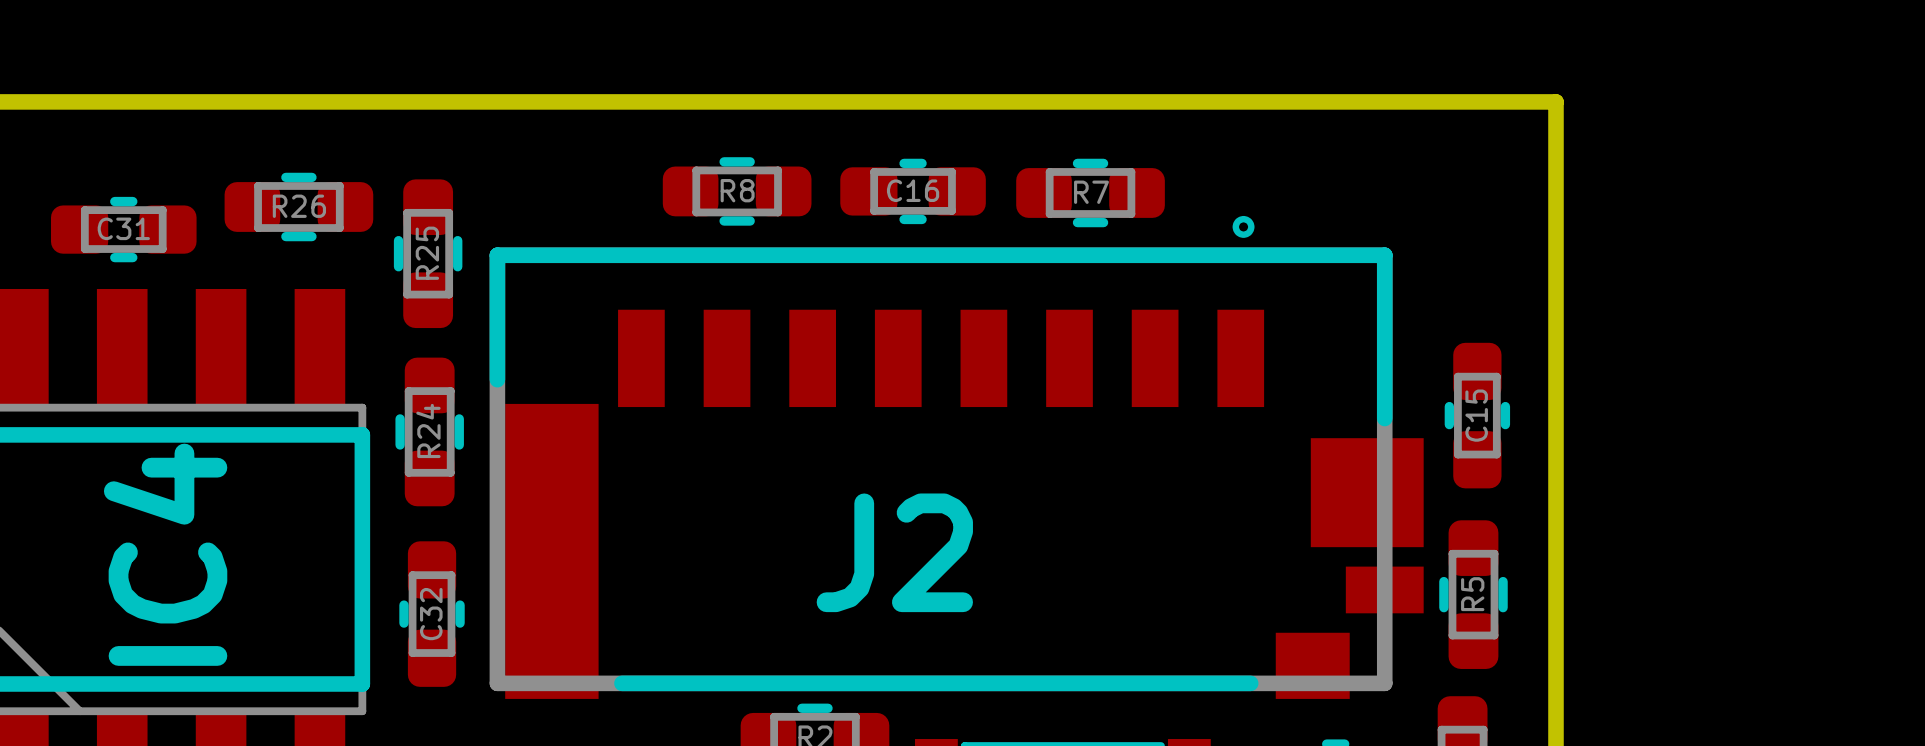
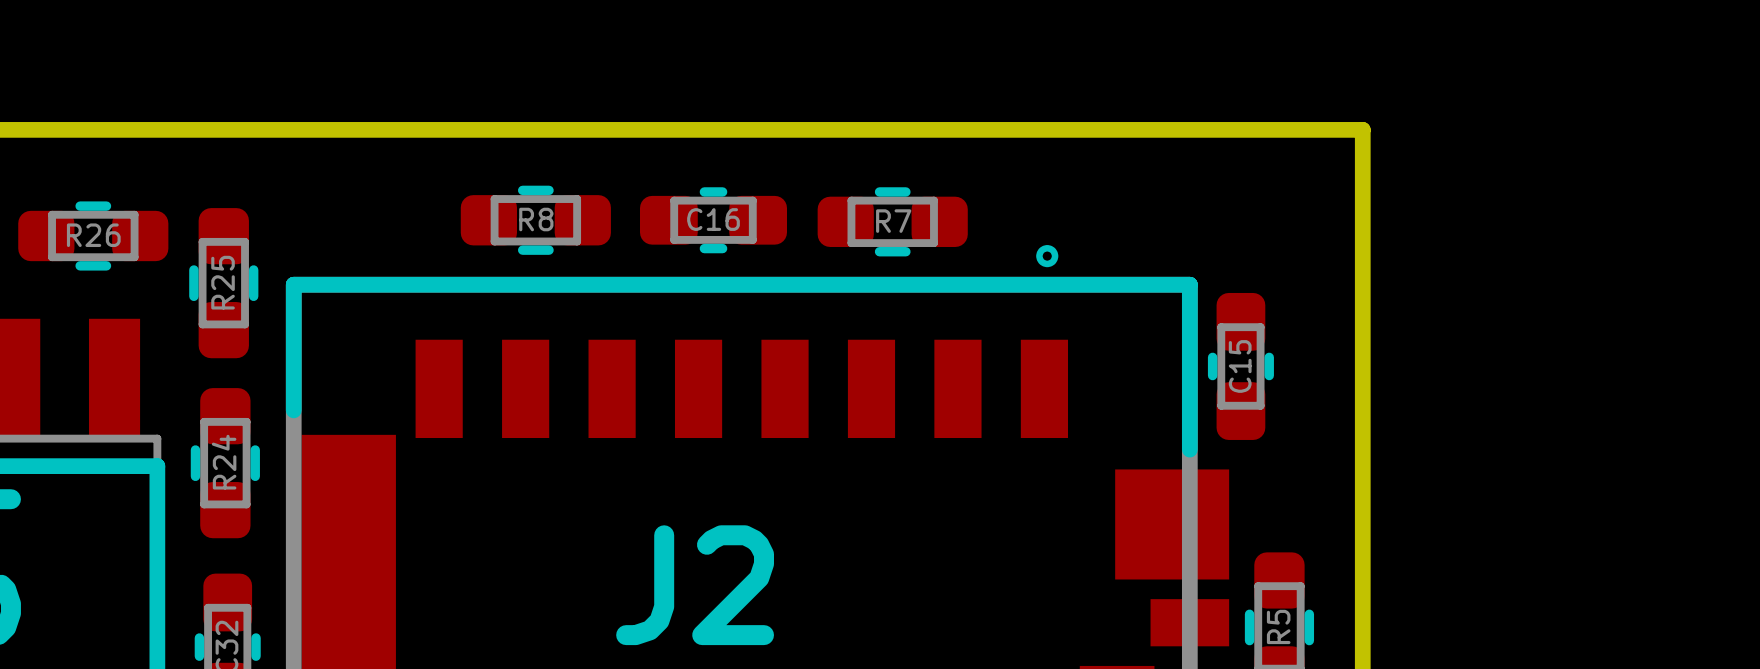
C15 position: (1477, 415) -> (1240, 366)

